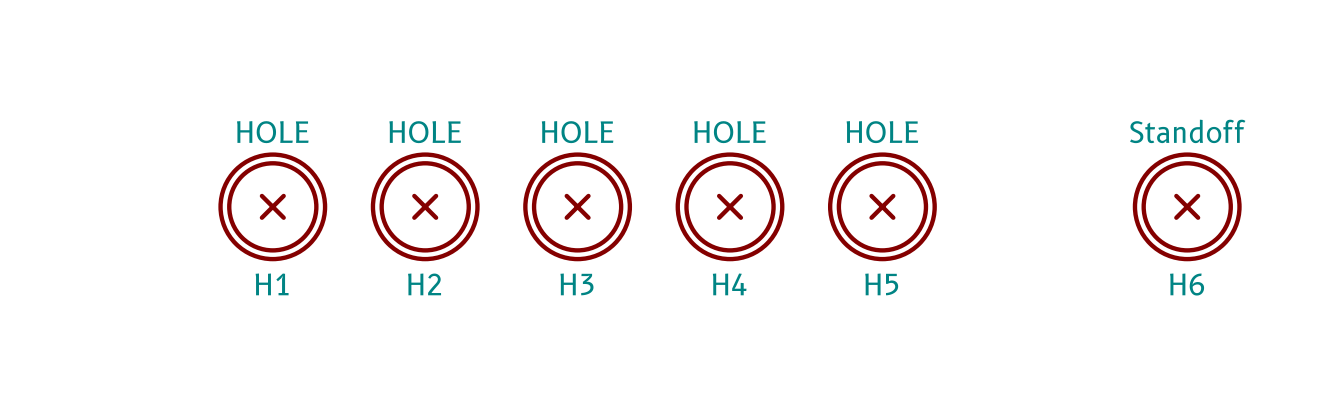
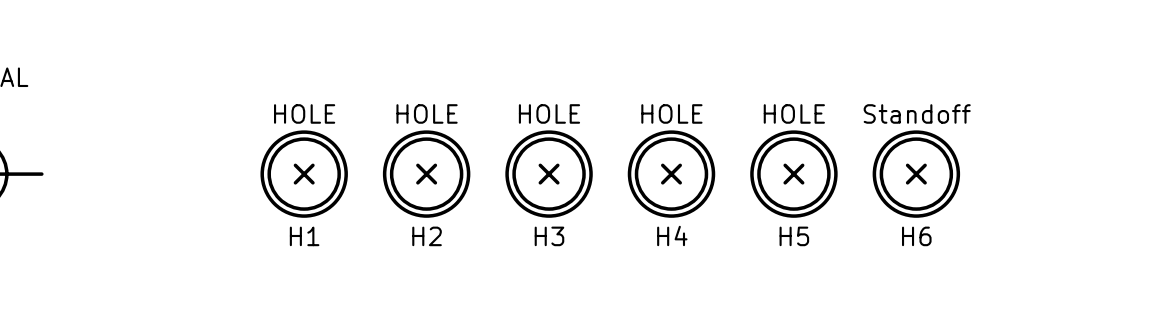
H6 position: (1187, 206) -> (916, 174)

